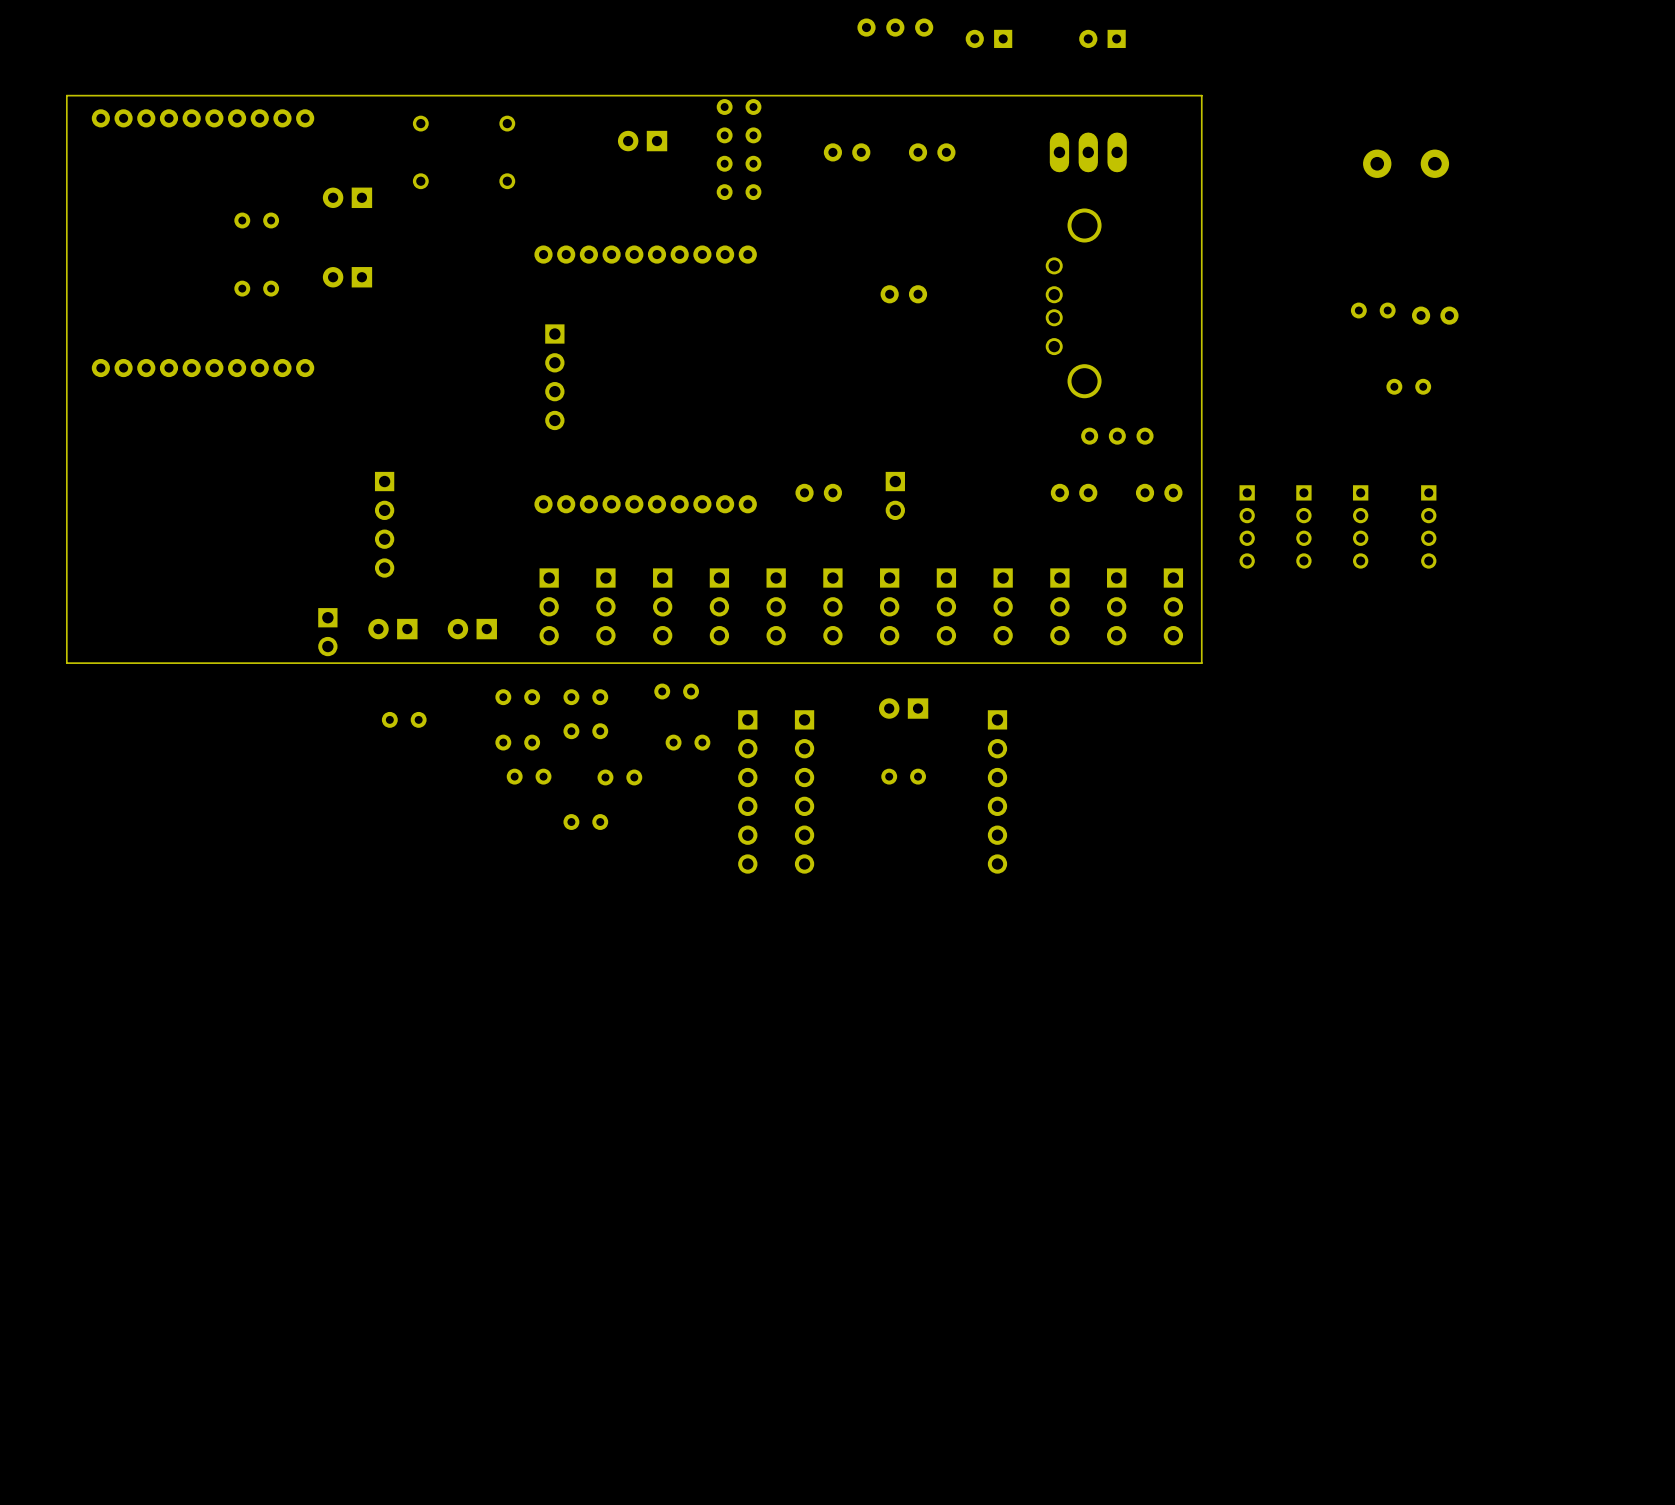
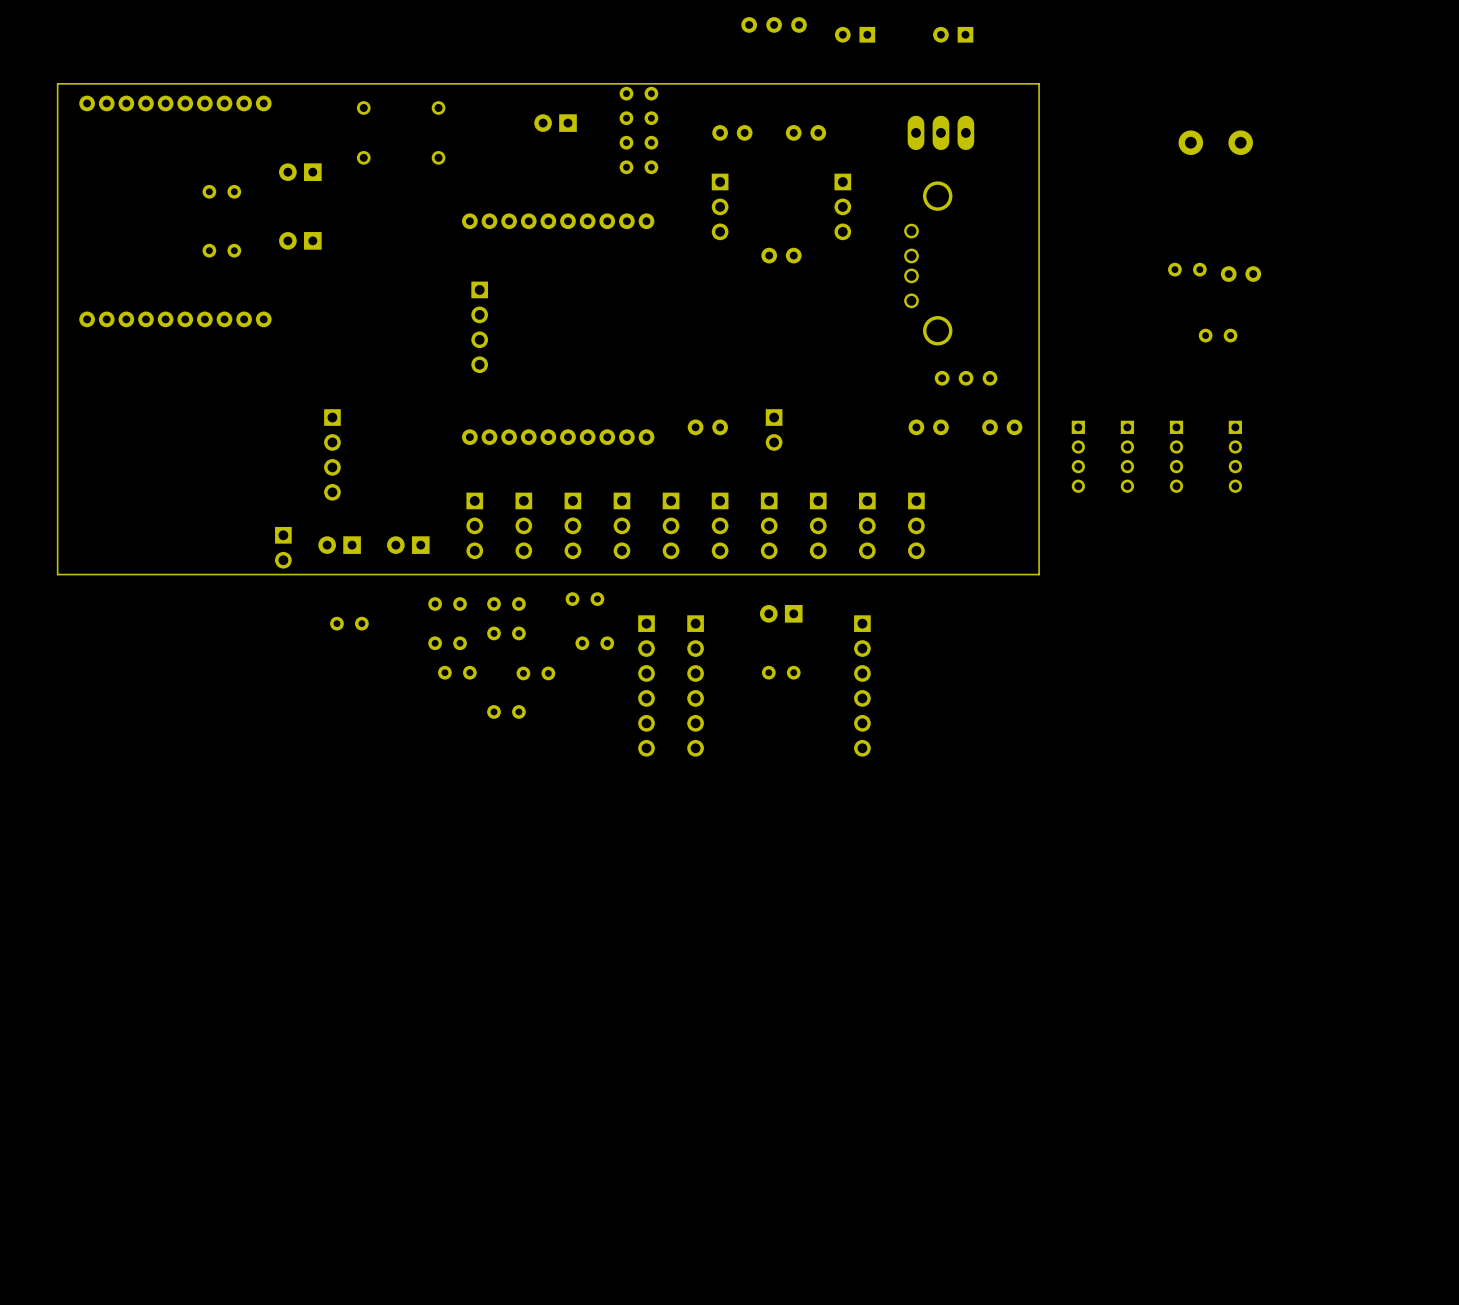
part: none -> (720, 206)
part: none -> (842, 206)
part: (1116, 606) -> none
part: (1173, 606) -> none

